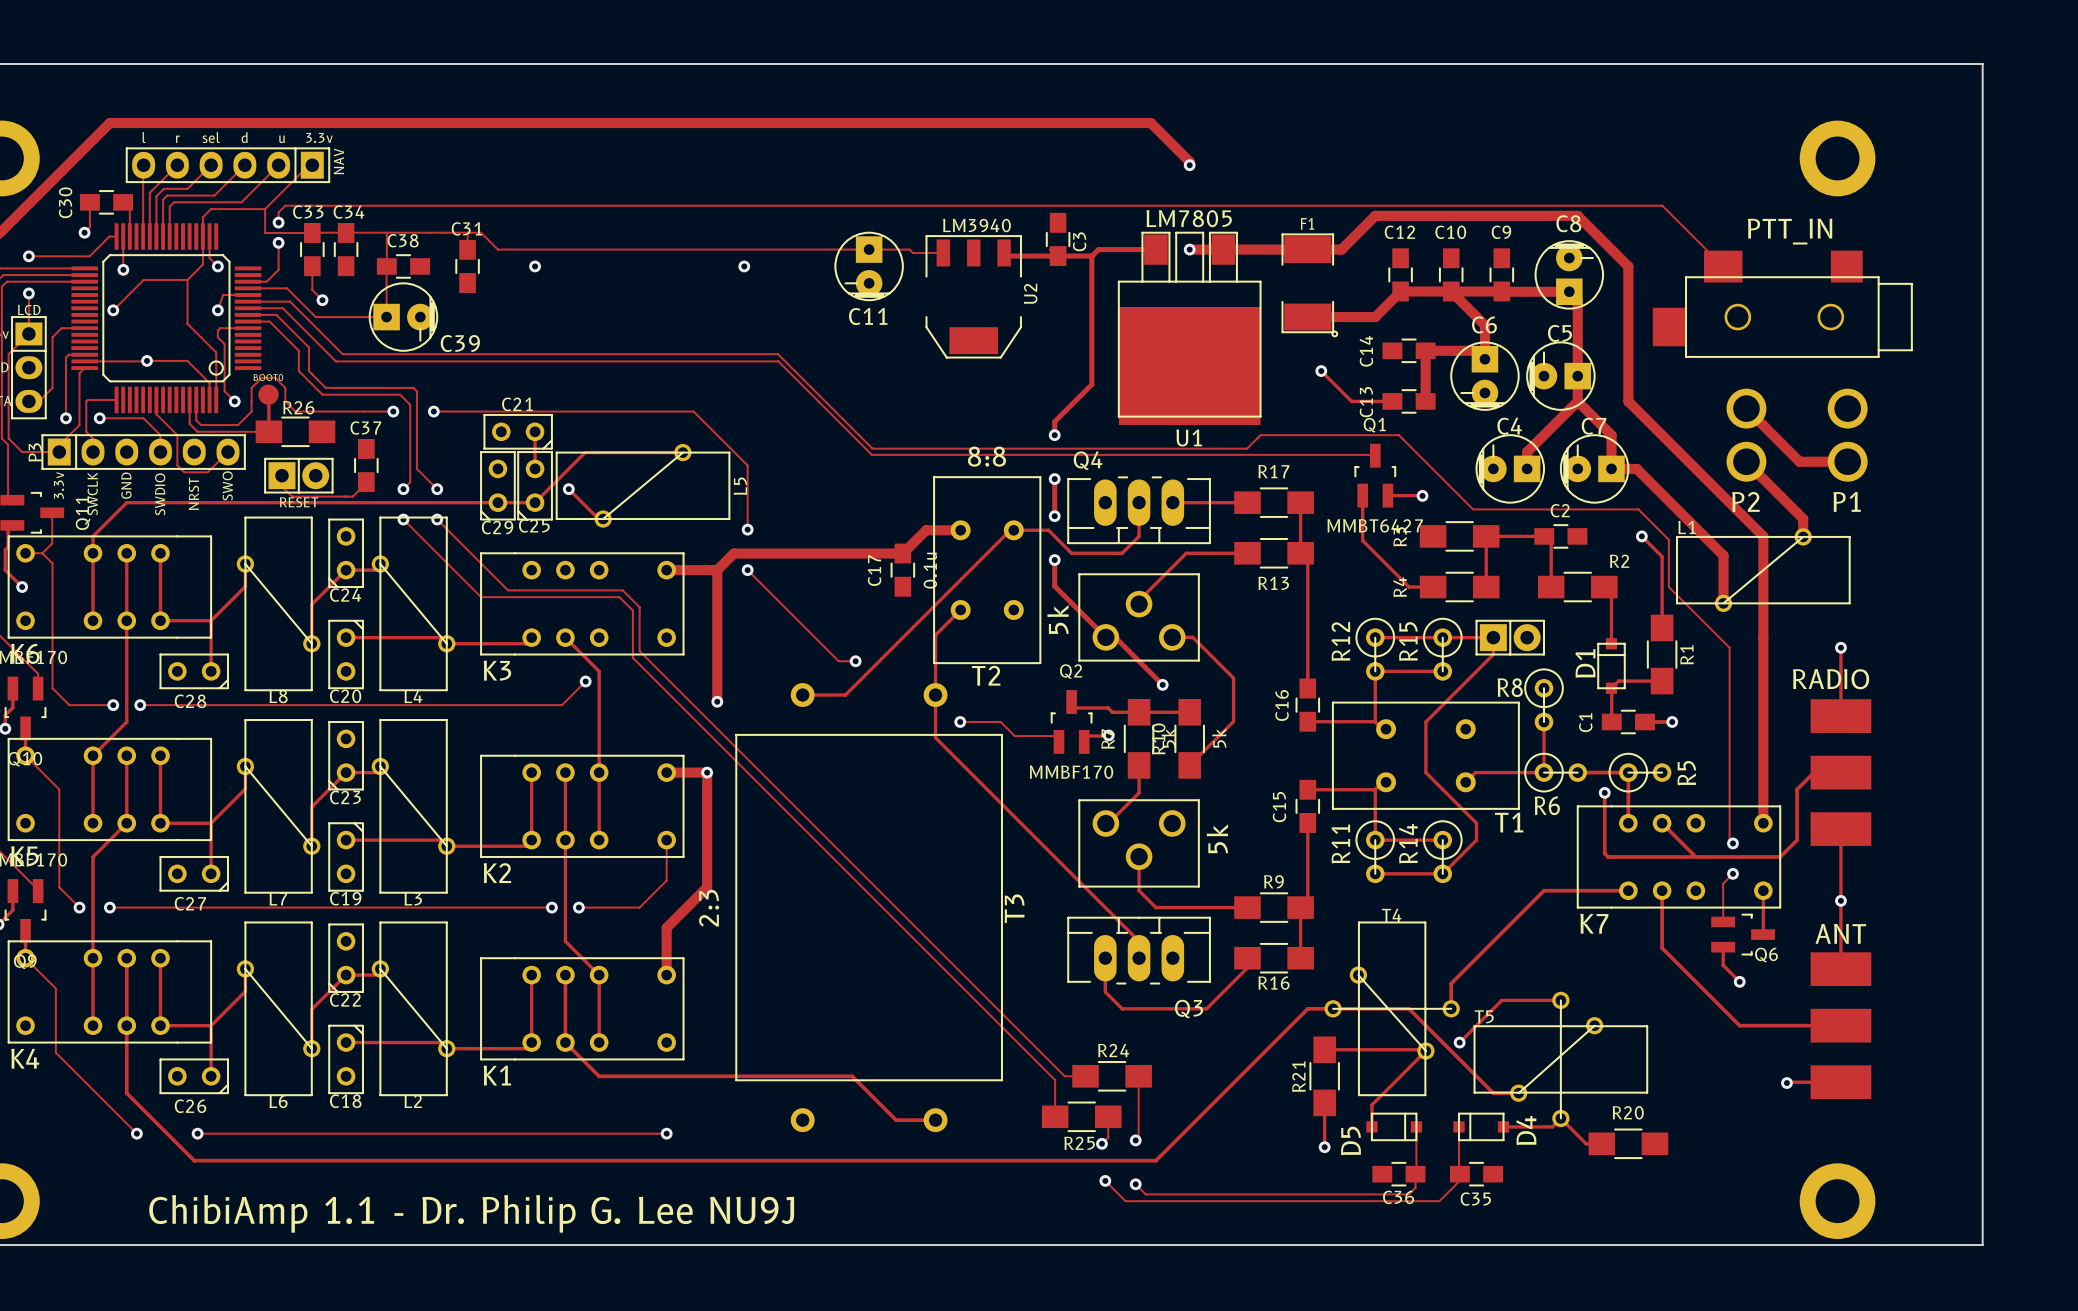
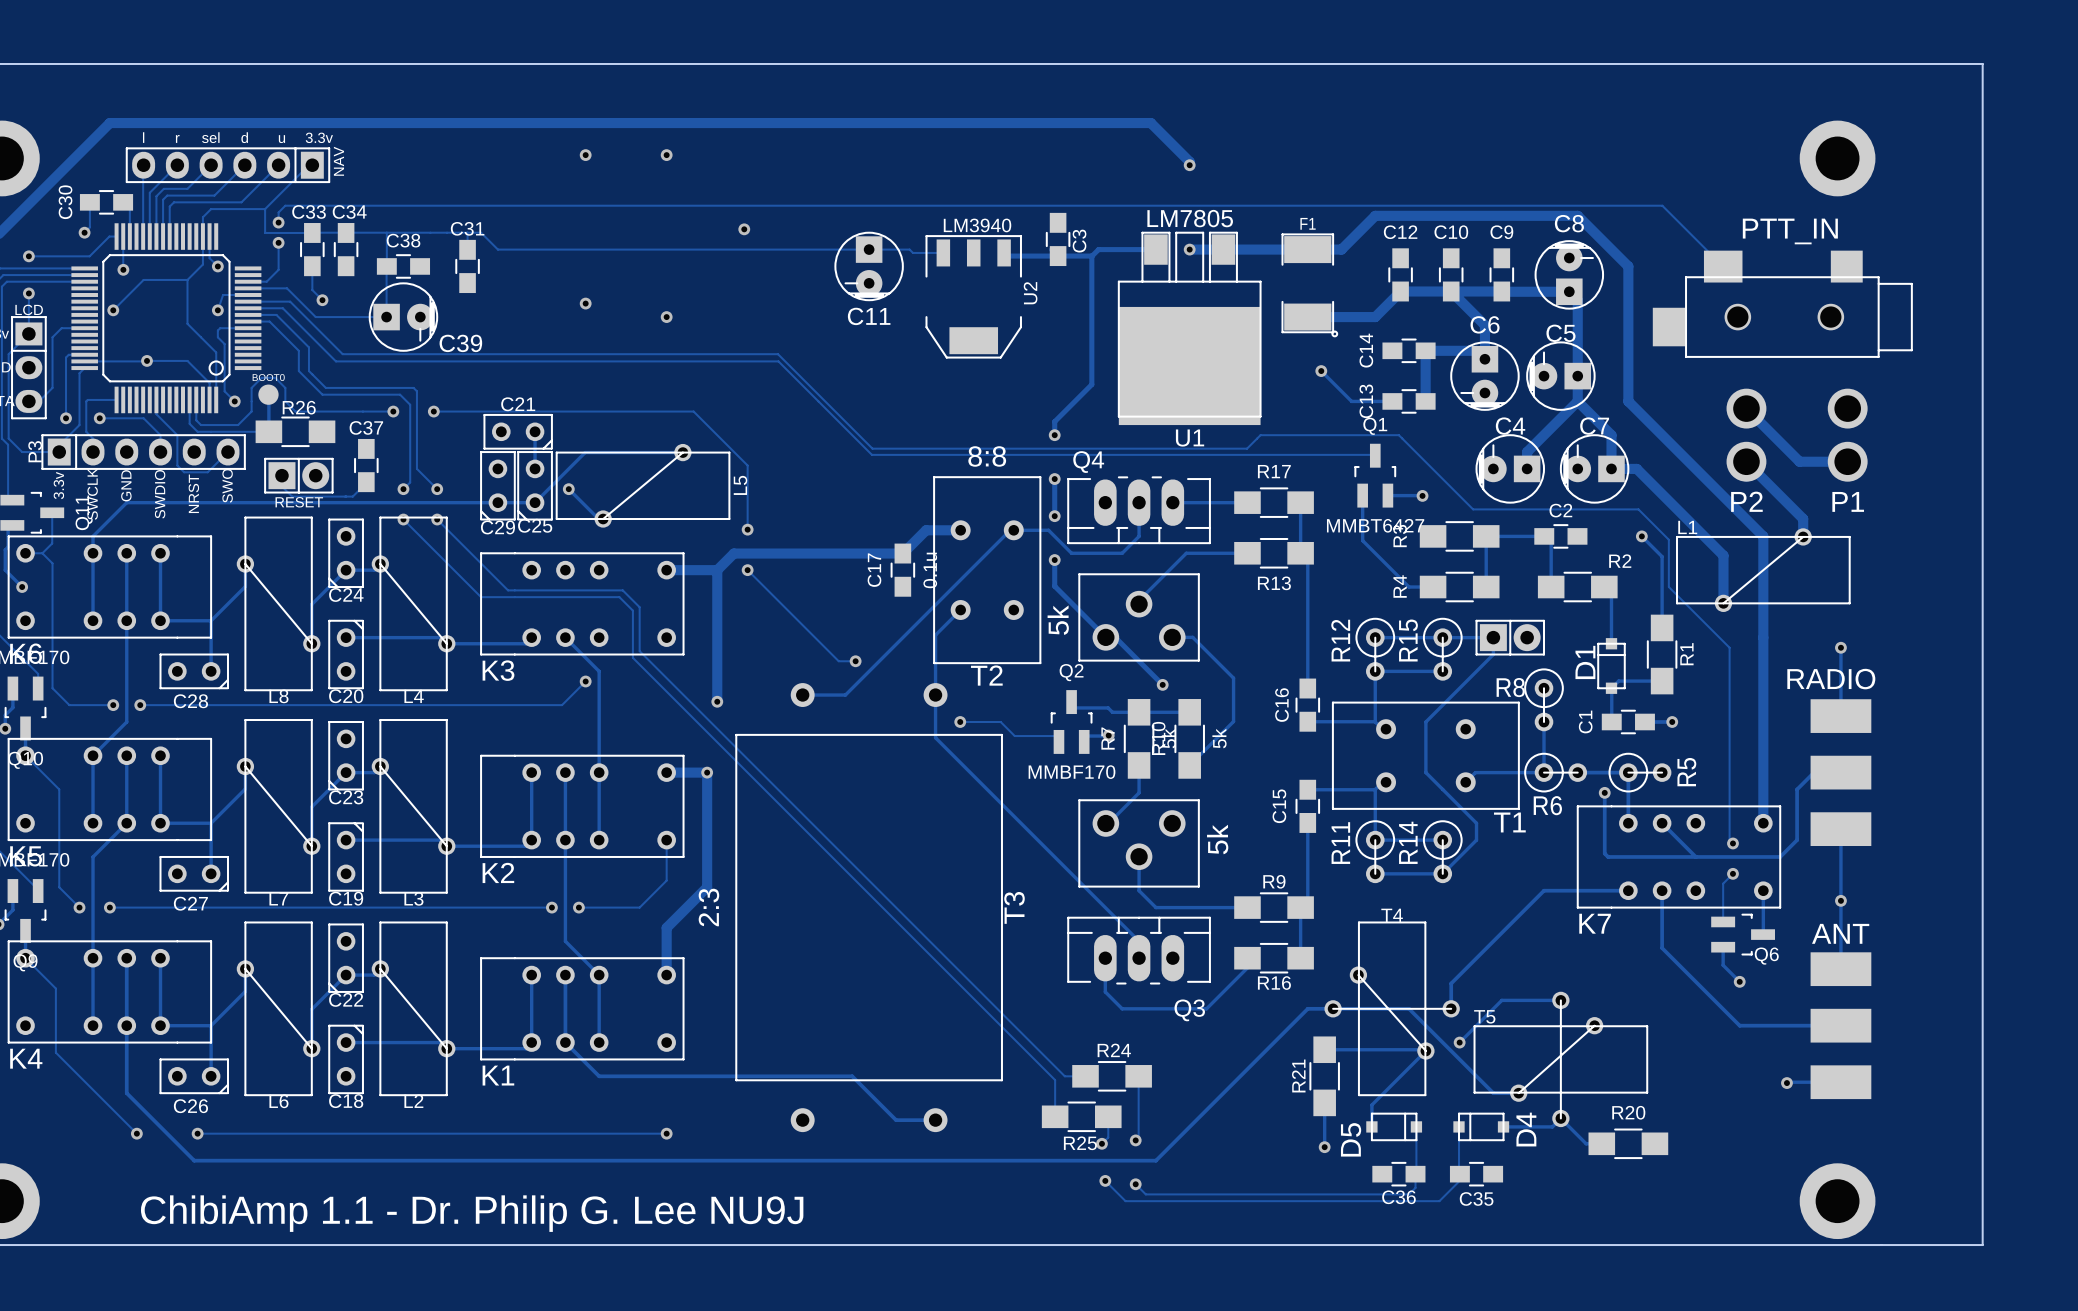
via: none -> (585, 155)
via: none -> (666, 155)
via: (535, 266) -> none
via position: (744, 266) -> (744, 229)
via: none -> (585, 303)
via: none -> (666, 317)

